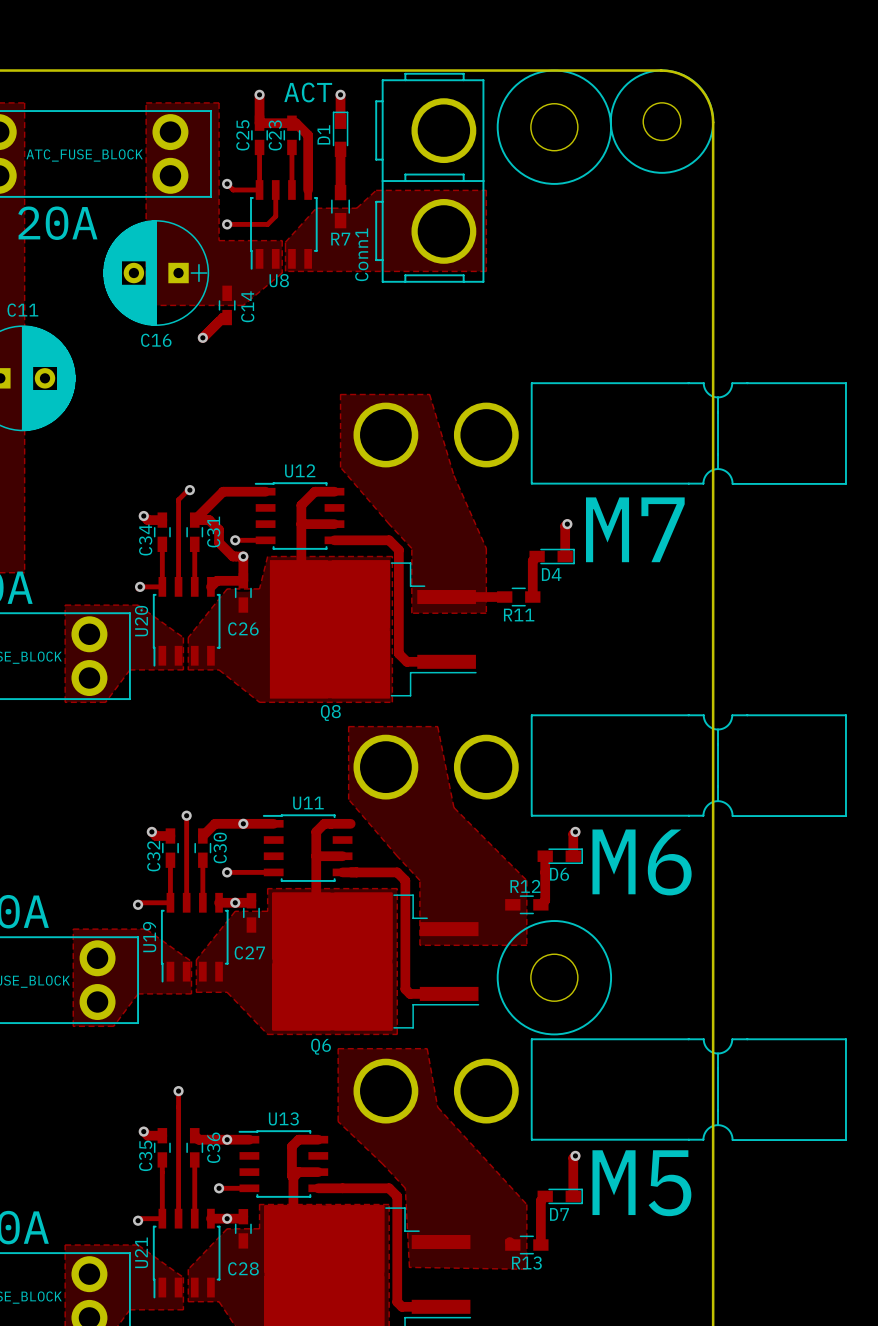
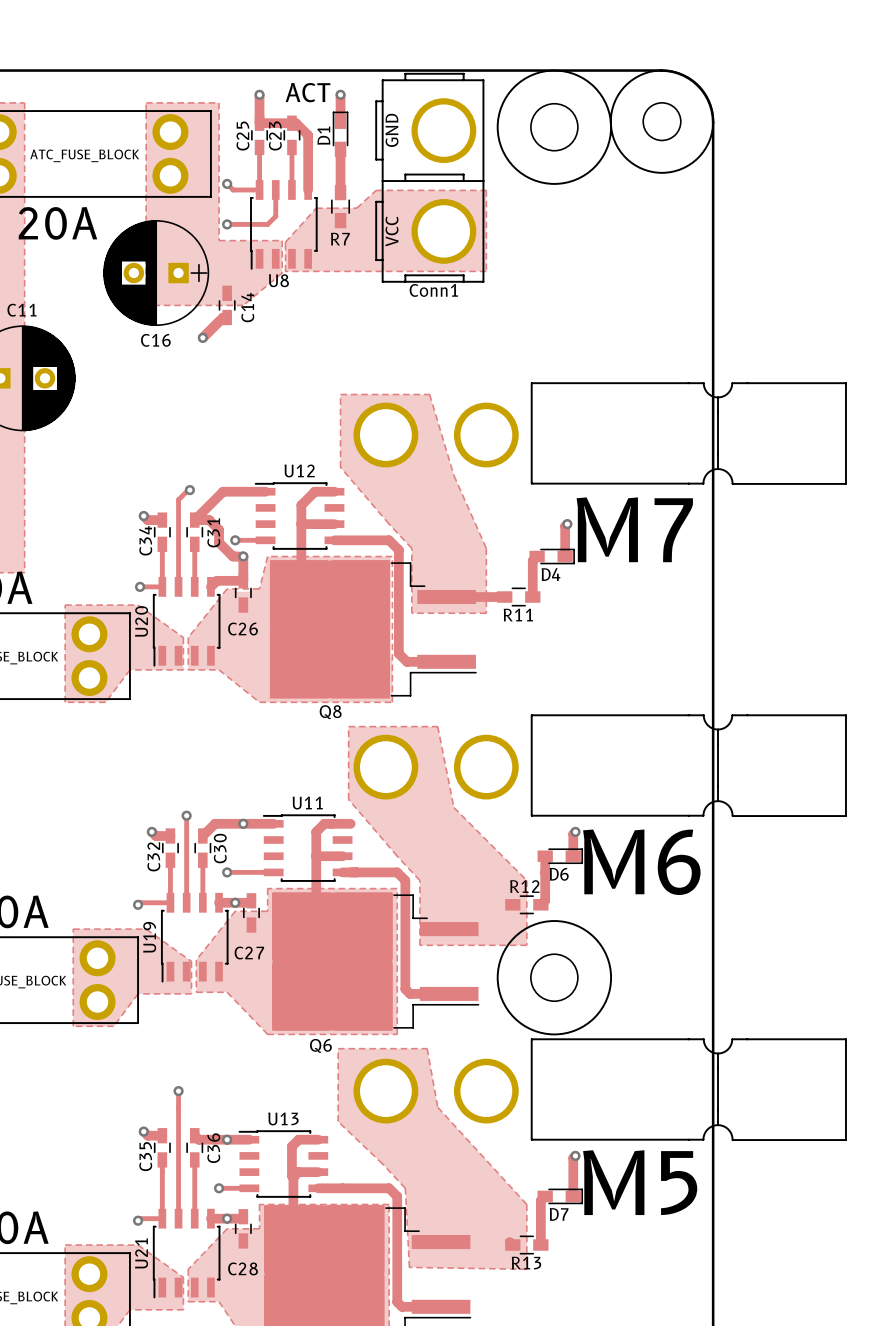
Conn1 text: none -> GND (391, 130)
Conn1 text: none -> VCC (391, 231)
Conn1 name rotation: 0° (361, 254) -> 90° clockwise (433, 290)
Conn1 name position: Conn1 (361, 254) -> Conn1 (433, 290)

